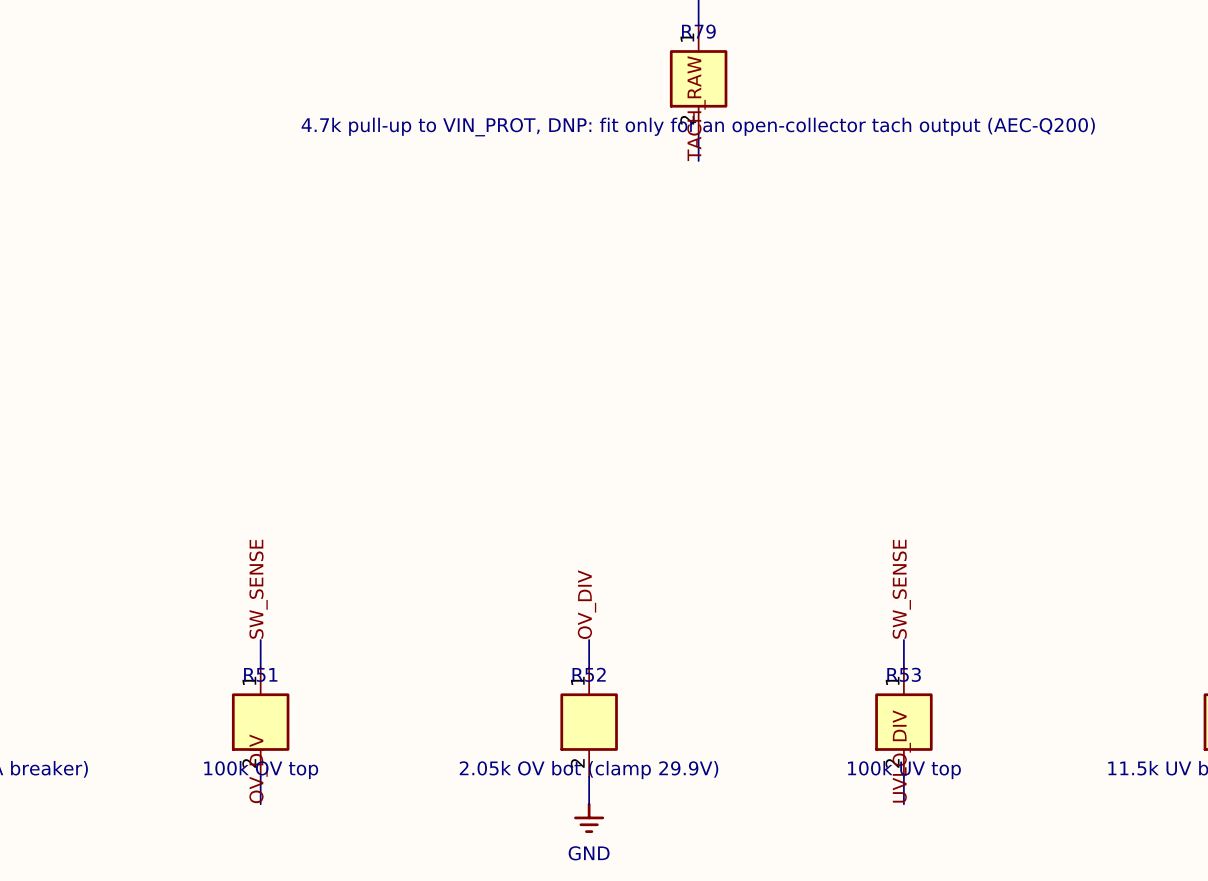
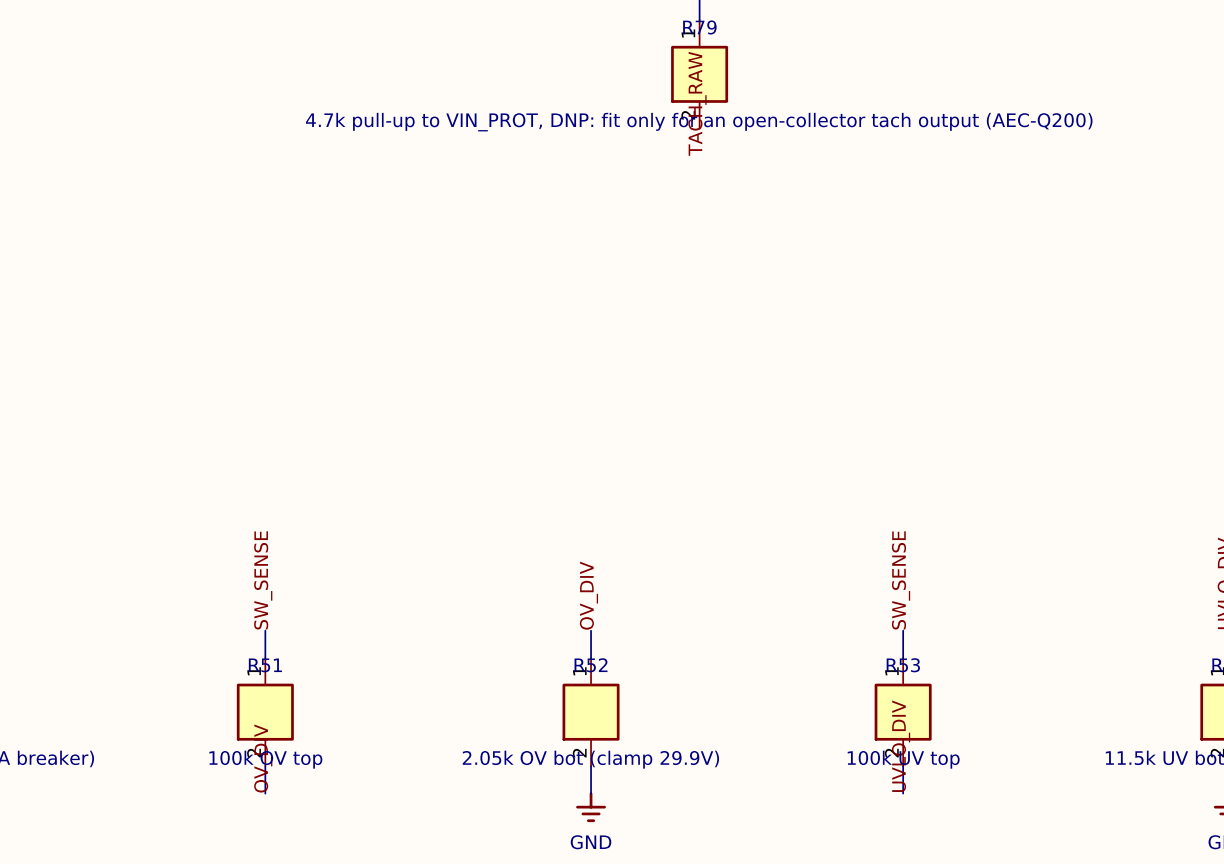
wire: (698, 133) (698, 160) -> none

